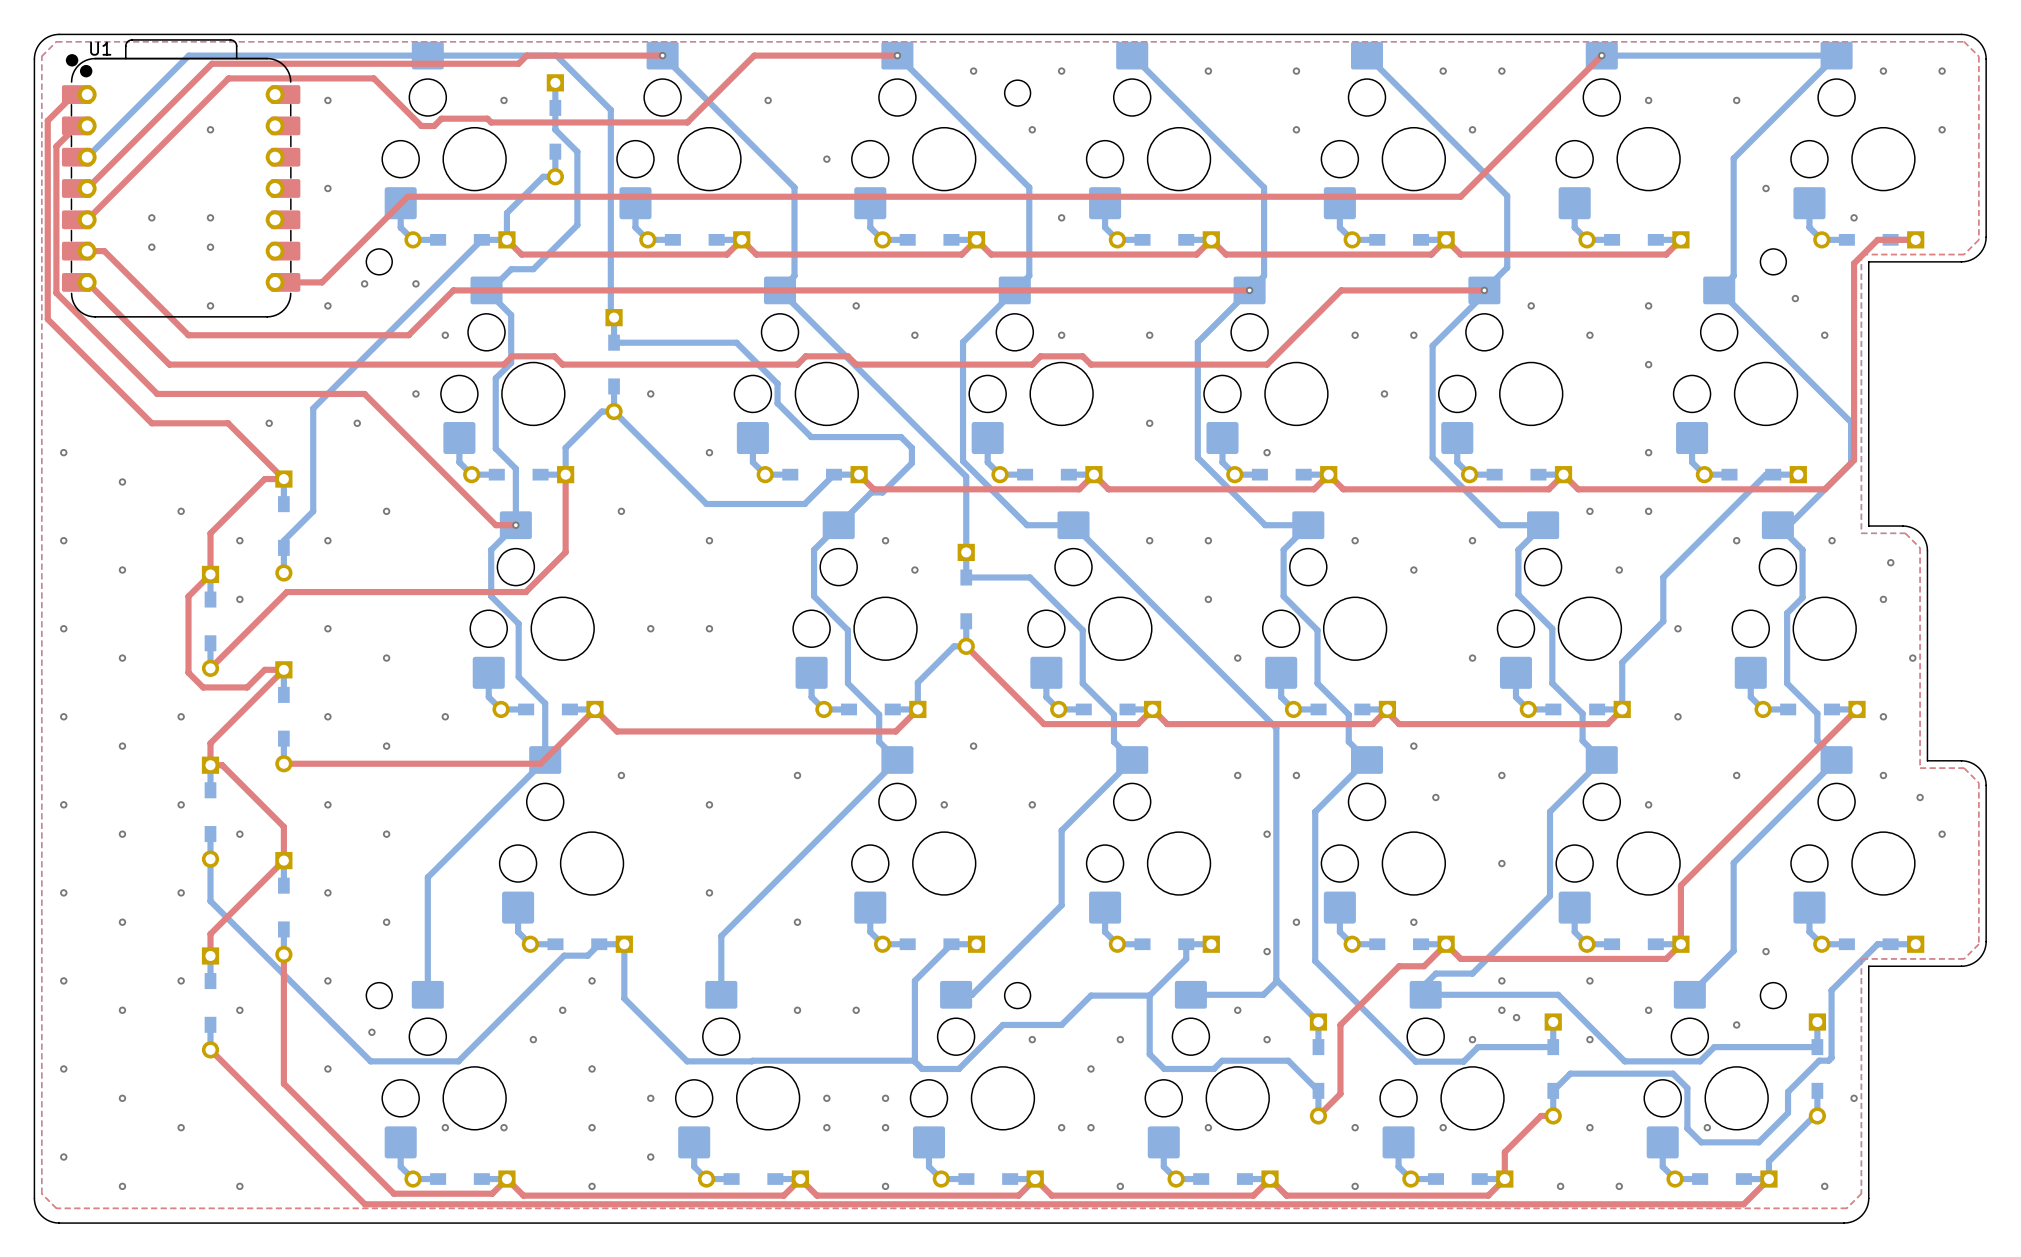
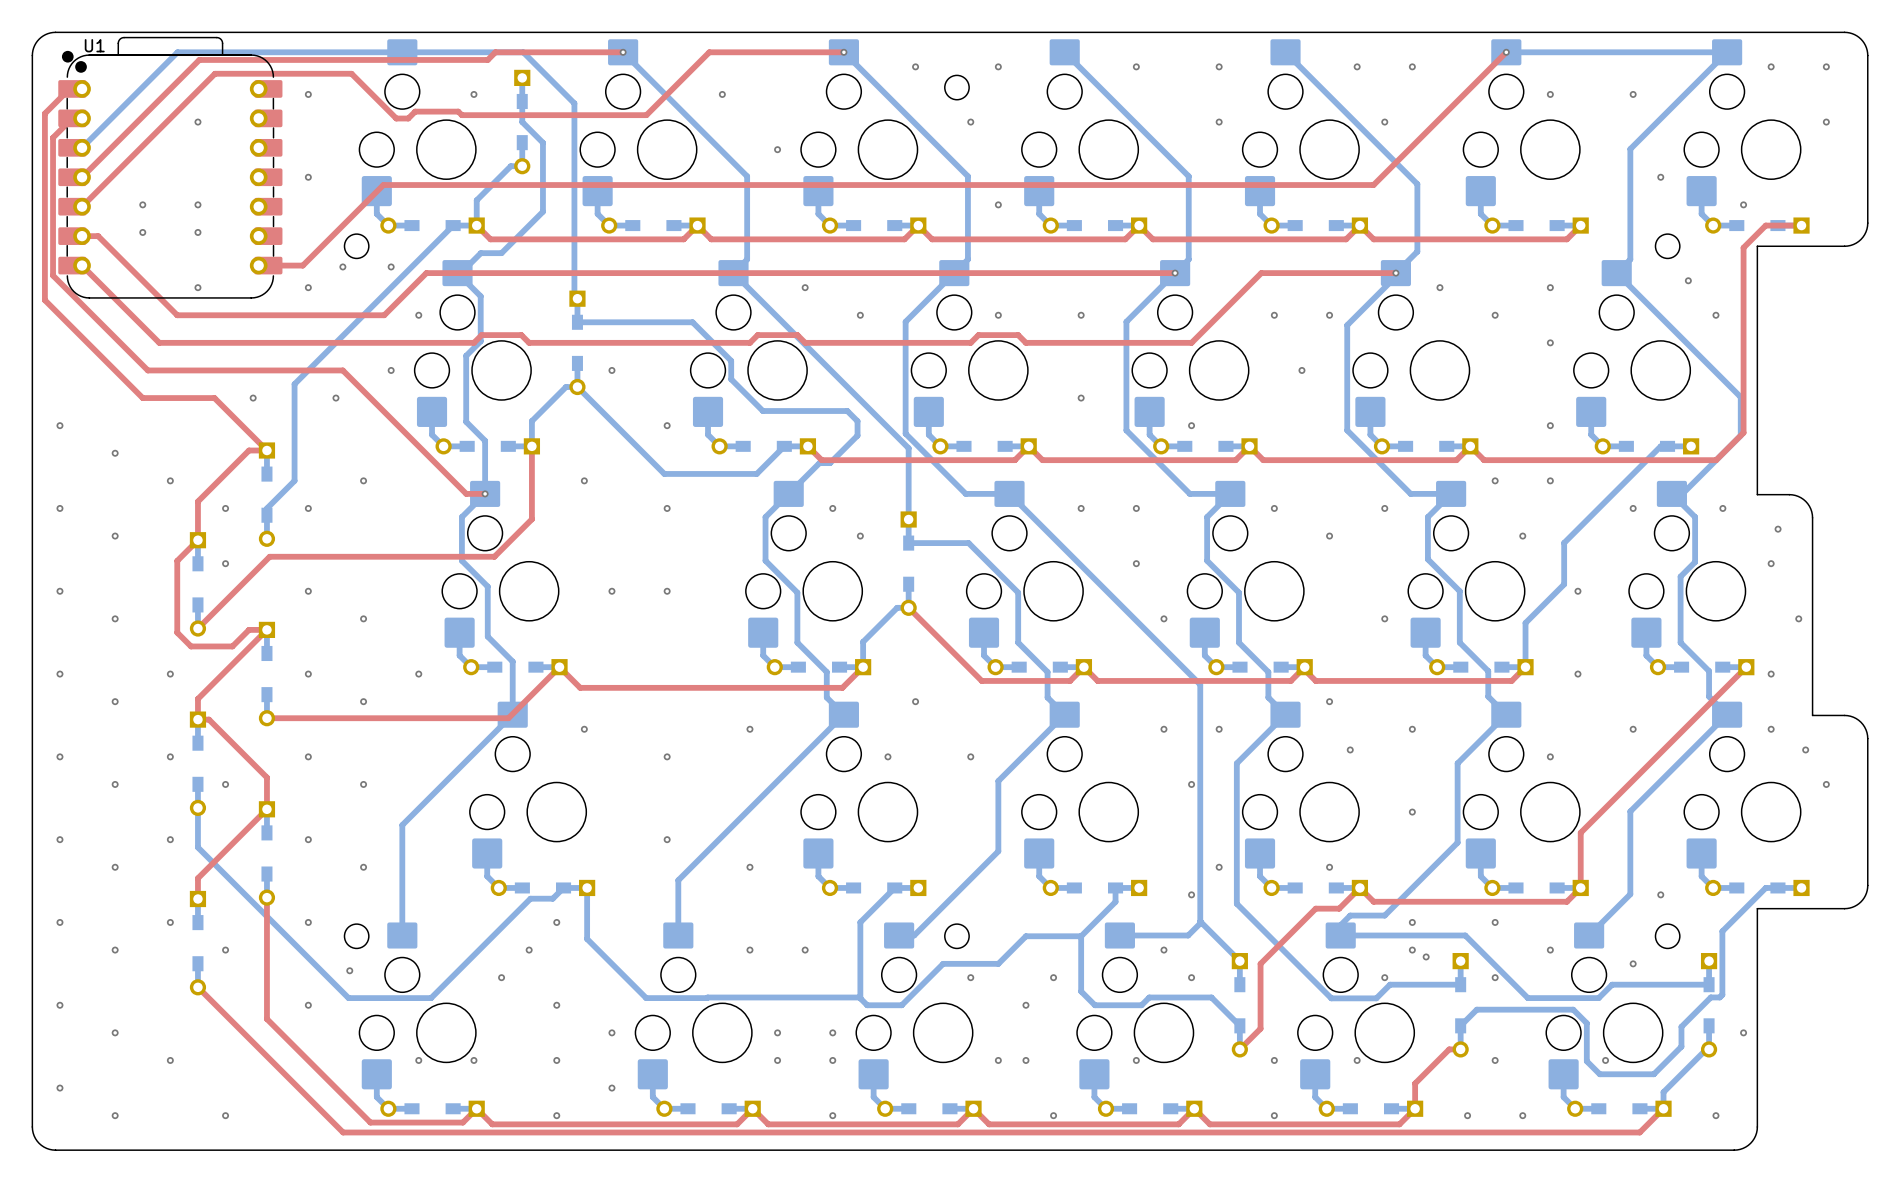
top zone outline: (56, 41) (41, 56) (41, 1193) (56, 1208) (1846, 1208) (1861, 1193) (1861, 958) (1964, 958) (1978, 944) (1978, 782) (1964, 768) (1920, 768) (1920, 548) (1905, 533) (1861, 533) (1861, 254) (1964, 254) (1978, 239) (1978, 56) (1964, 41) (56, 41) -> none

